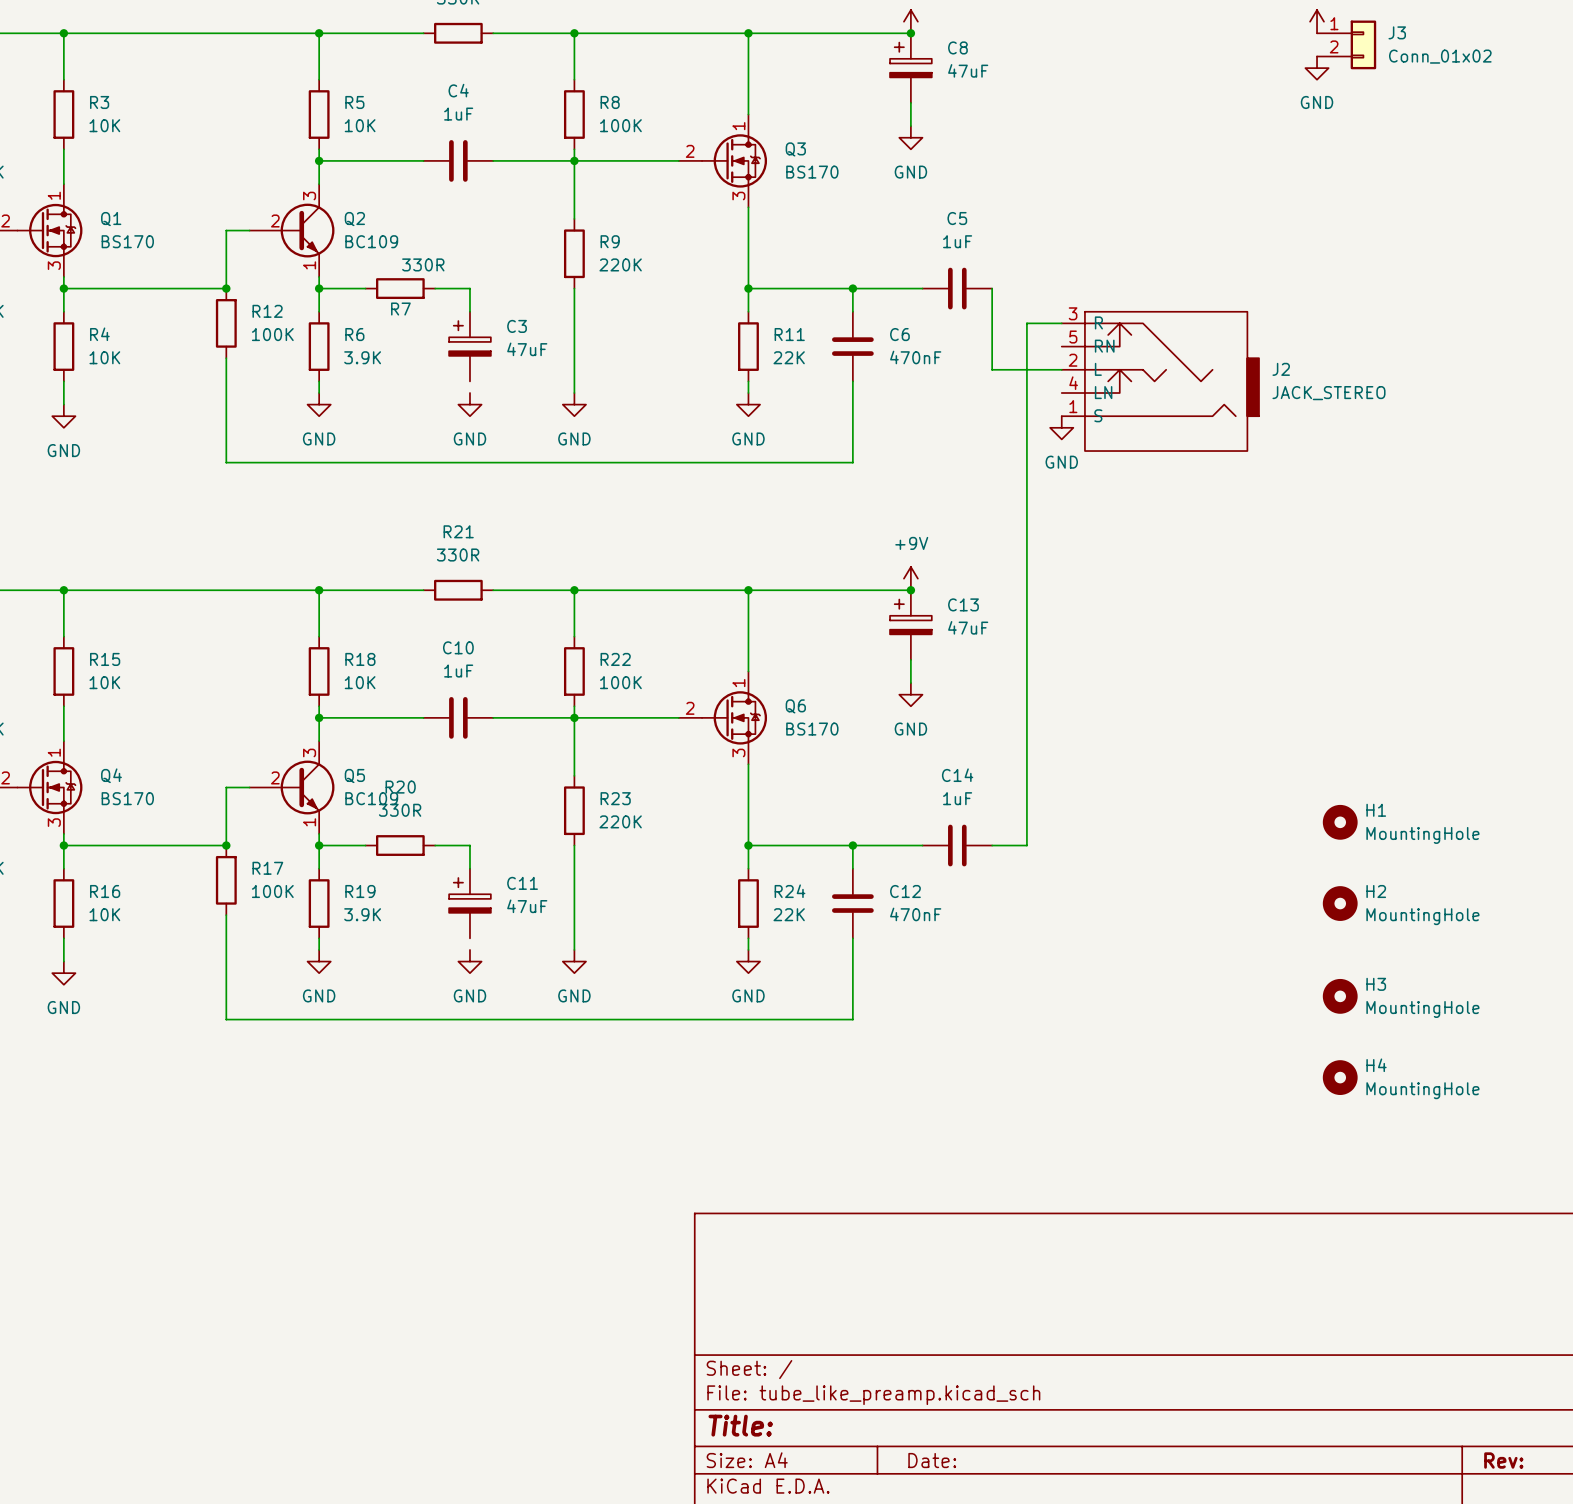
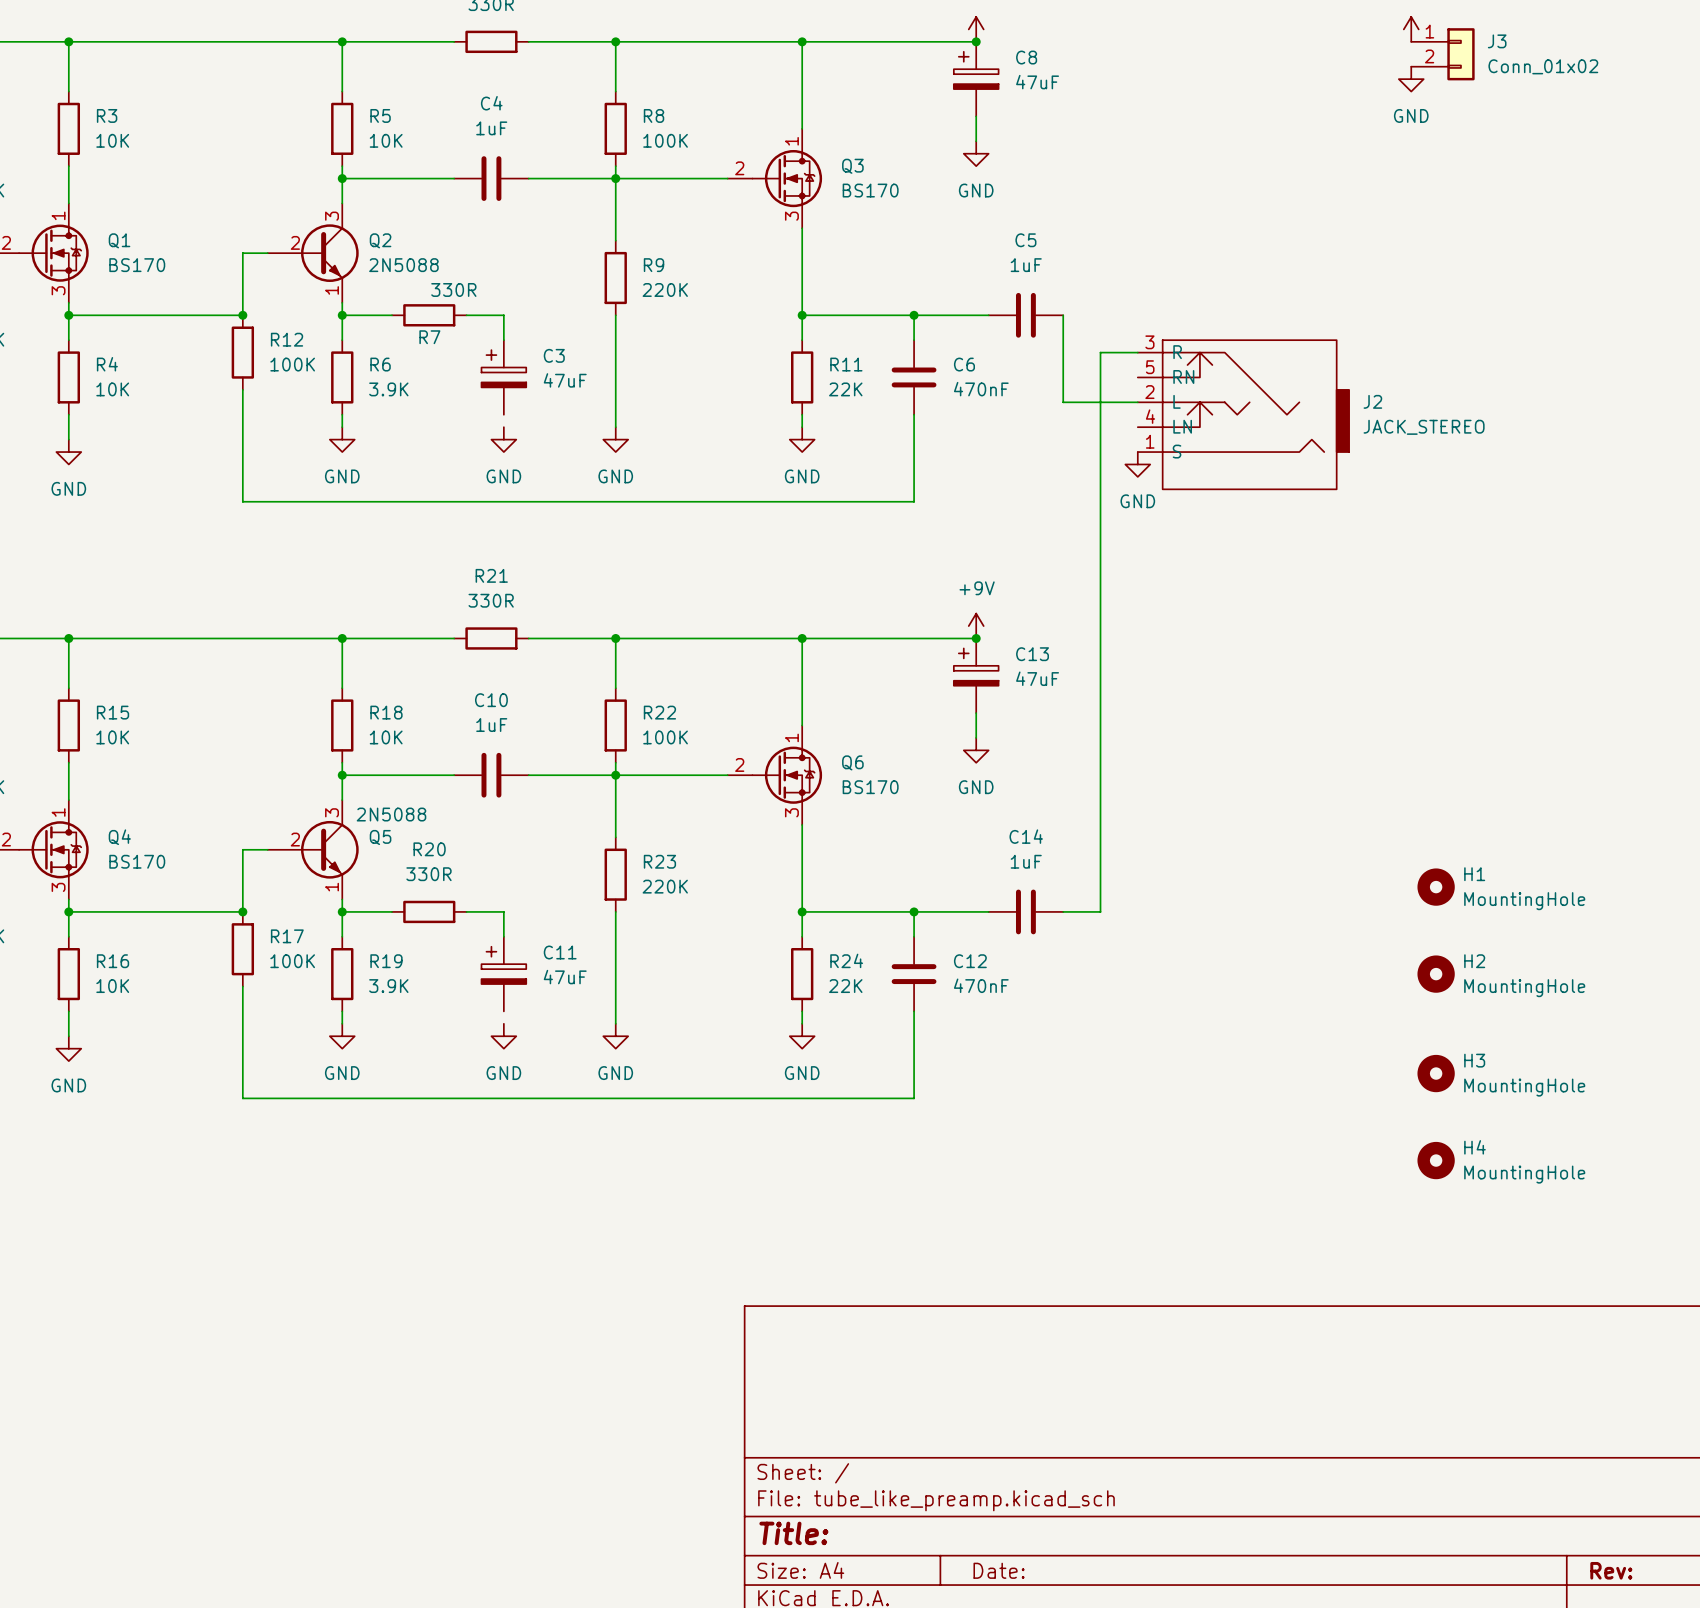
Q2 value: BC109 (371, 241) -> 2N5088 (403, 265)
Q5 value: BC109 (371, 798) -> 2N5088 (391, 814)

